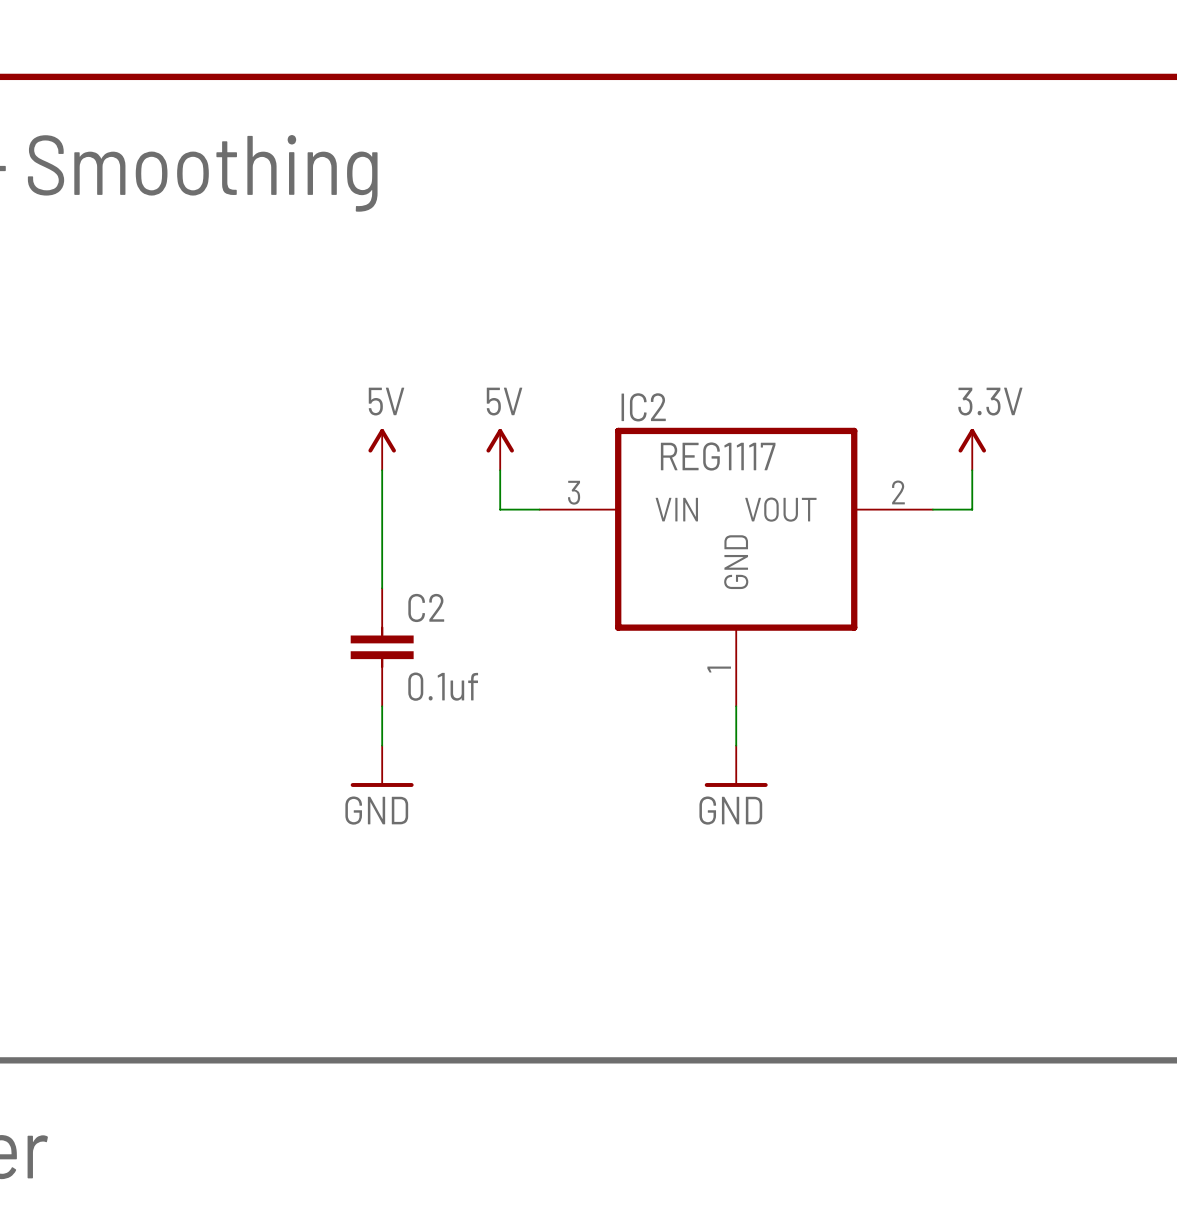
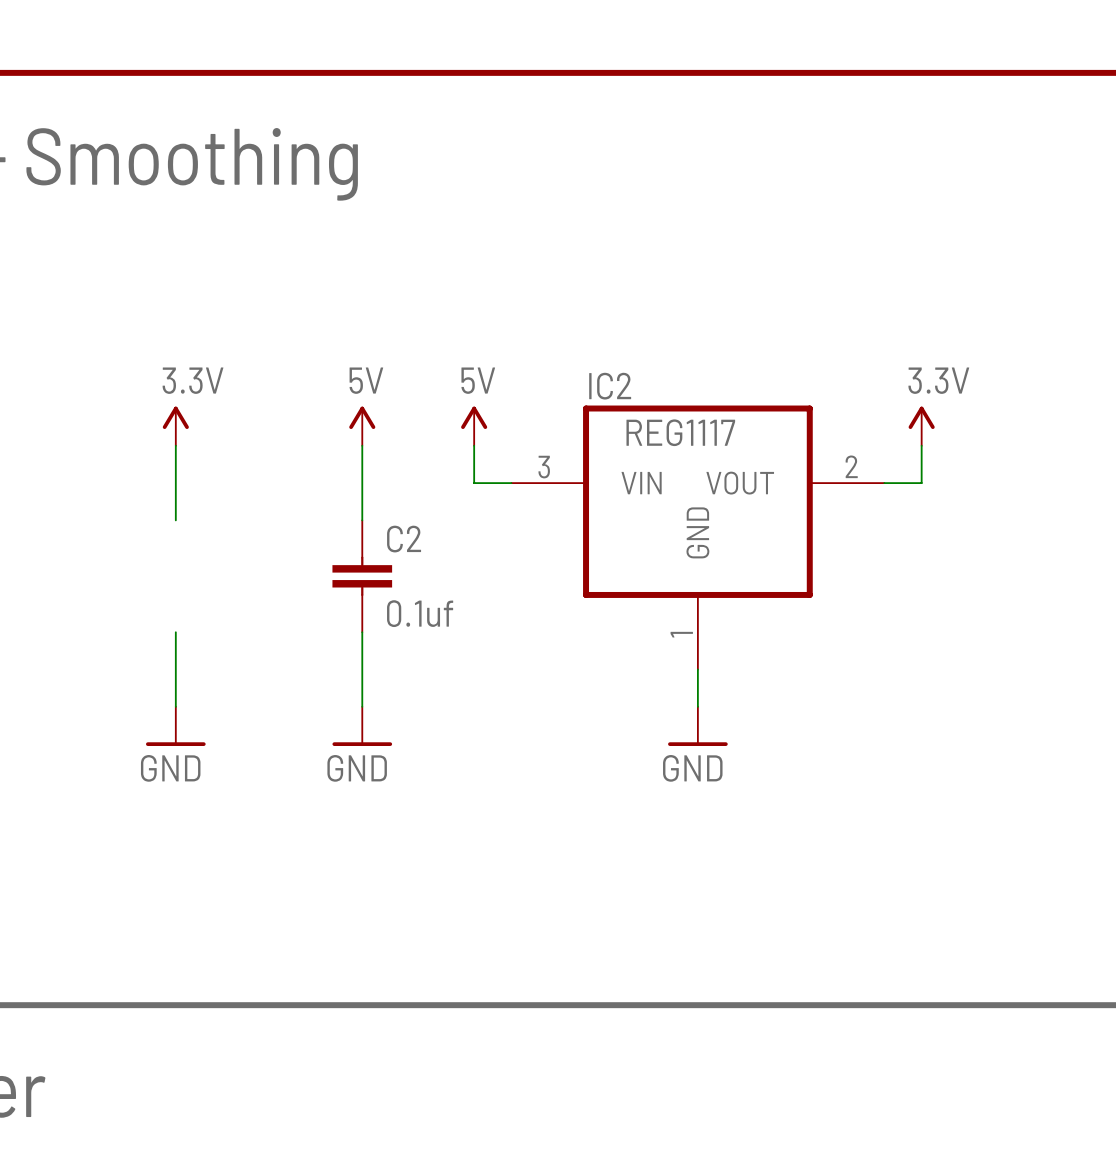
power symbol: none -> 3.3V (175, 426)
wire: none -> (175, 445) (175, 520)
C2 position: (382, 647) -> (362, 576)
wire: none -> (175, 632) (175, 706)
power symbol: none -> GND (175, 726)

